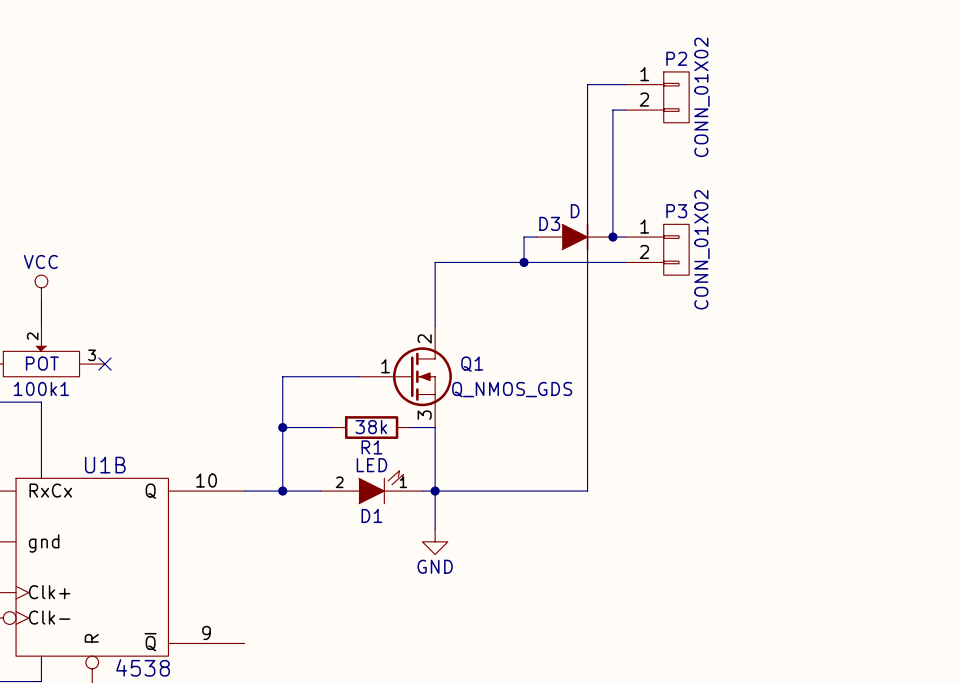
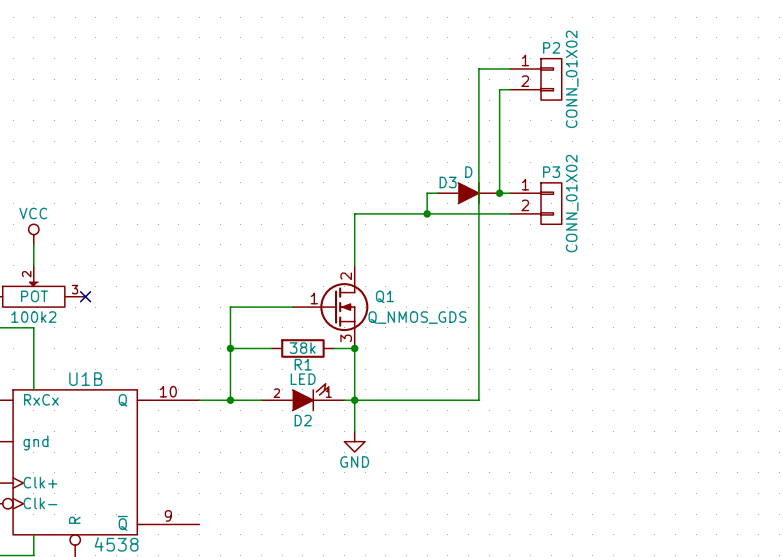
100k1 name: 100k1 (41, 388) -> 100k2 (33, 317)
junction: none -> (354, 348)
D1 name: D1 (371, 515) -> D2 (303, 420)

